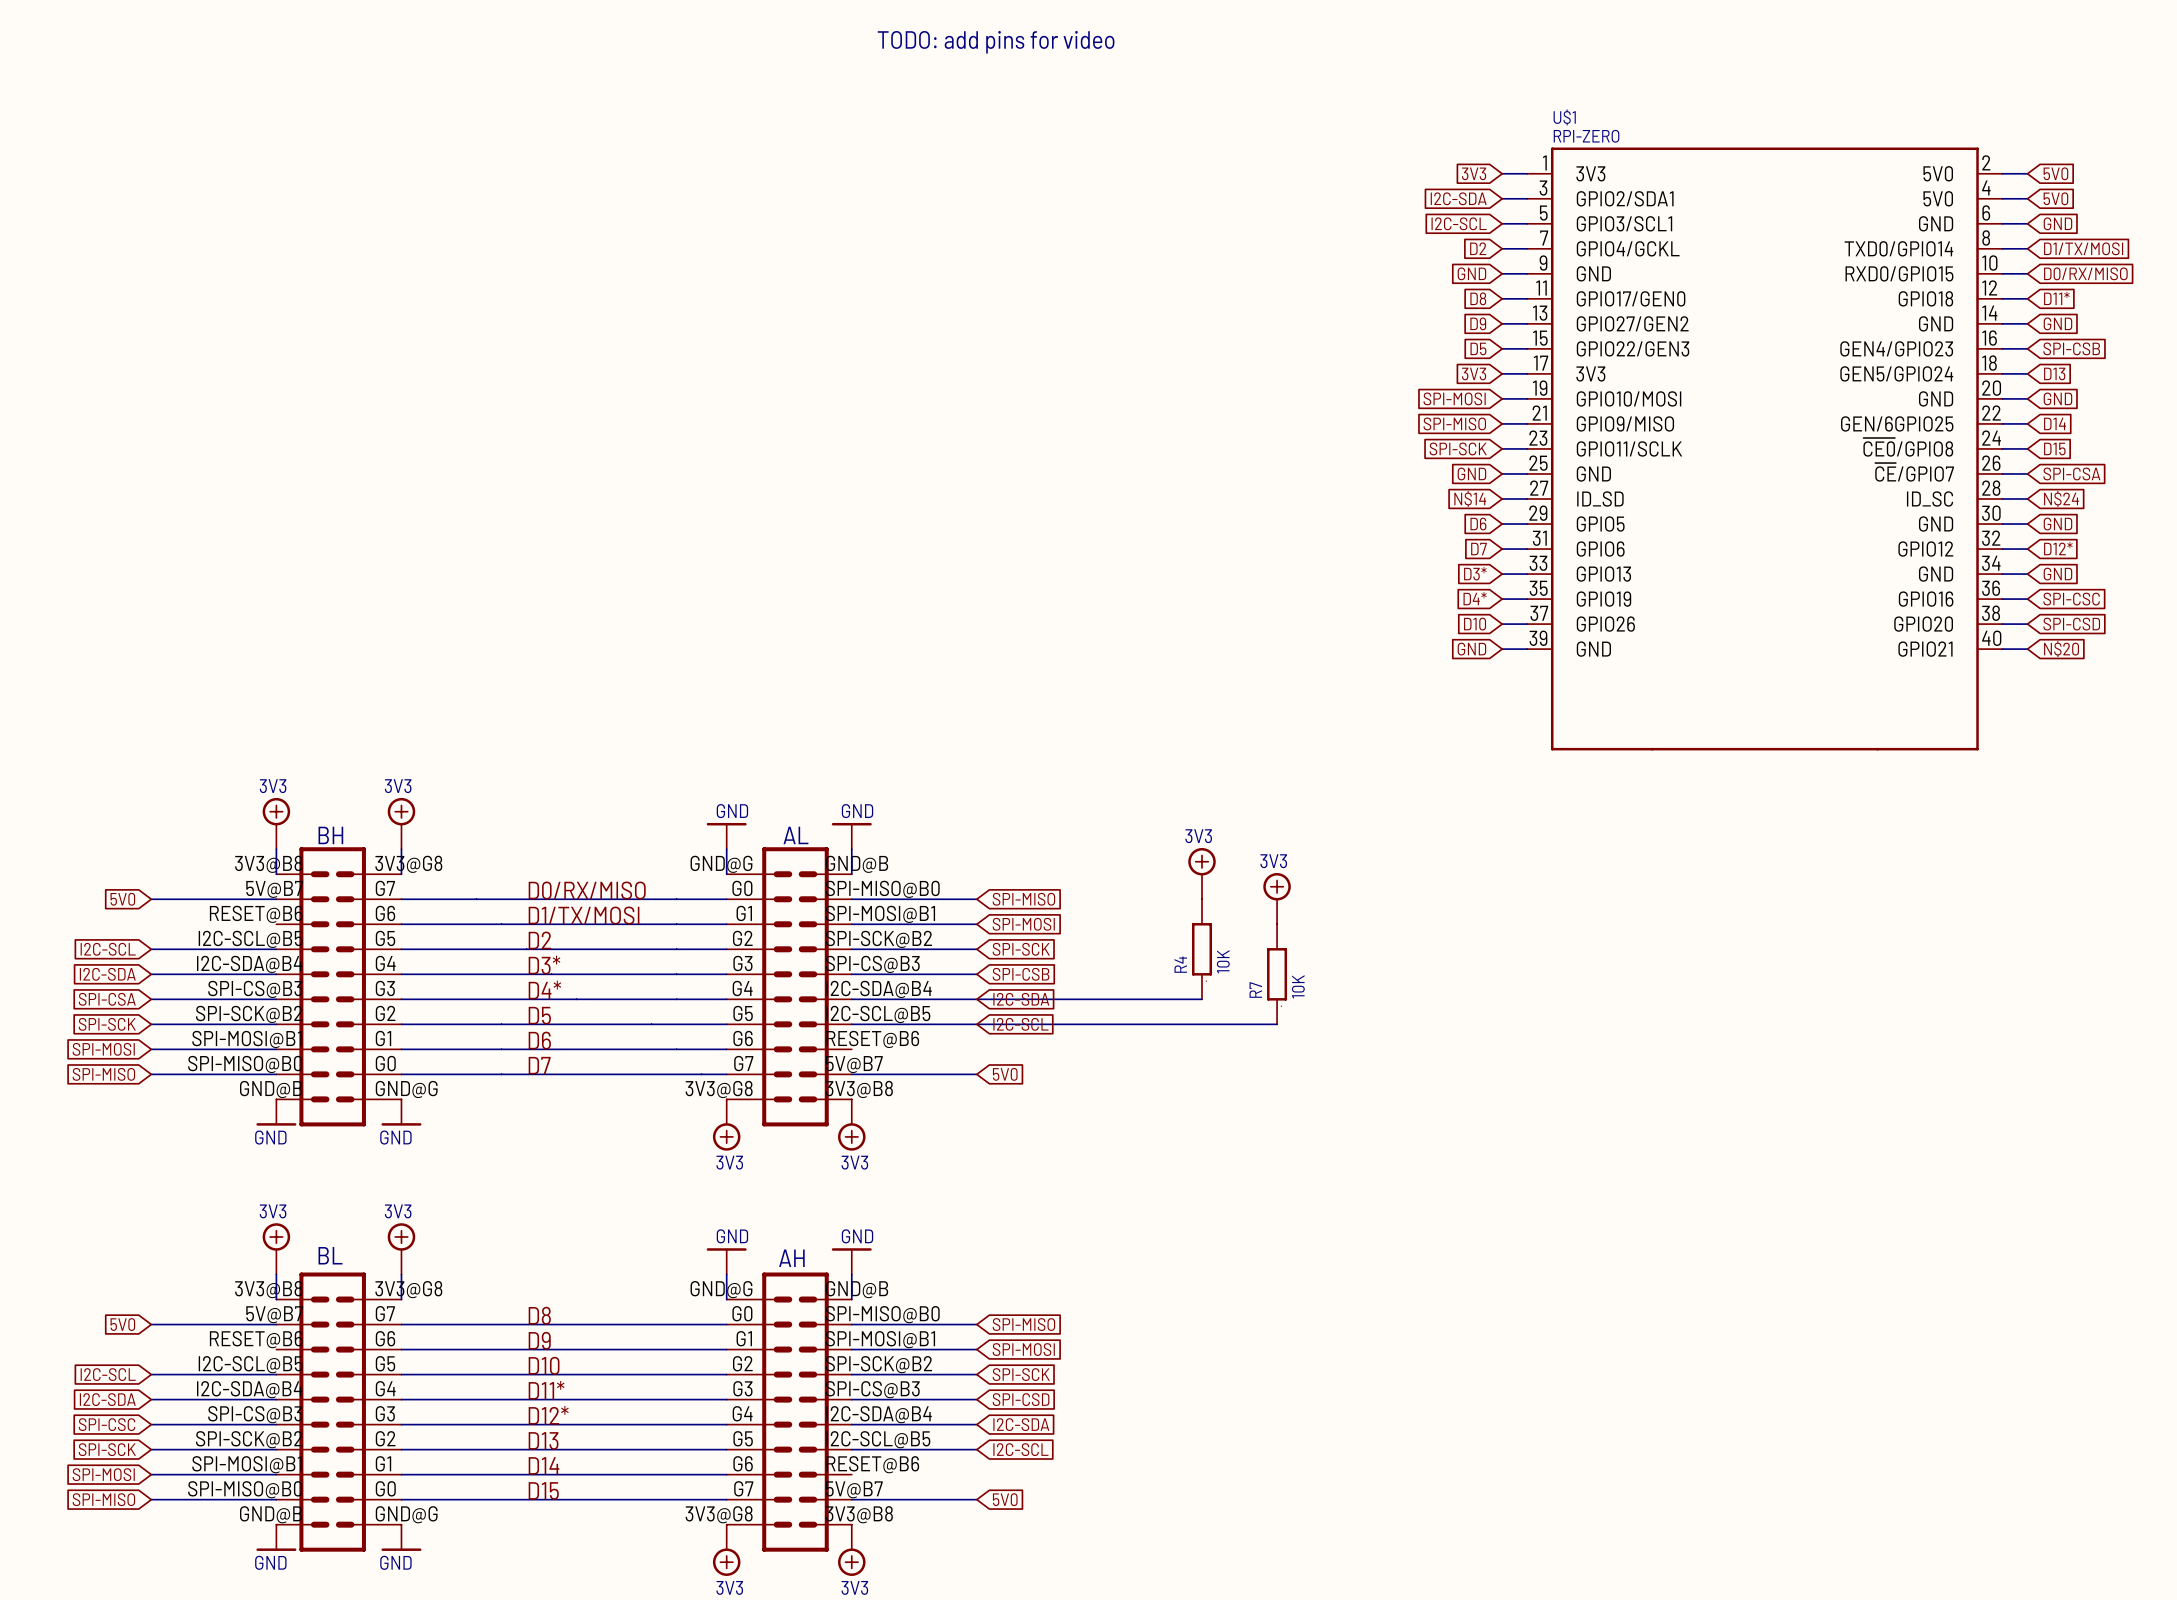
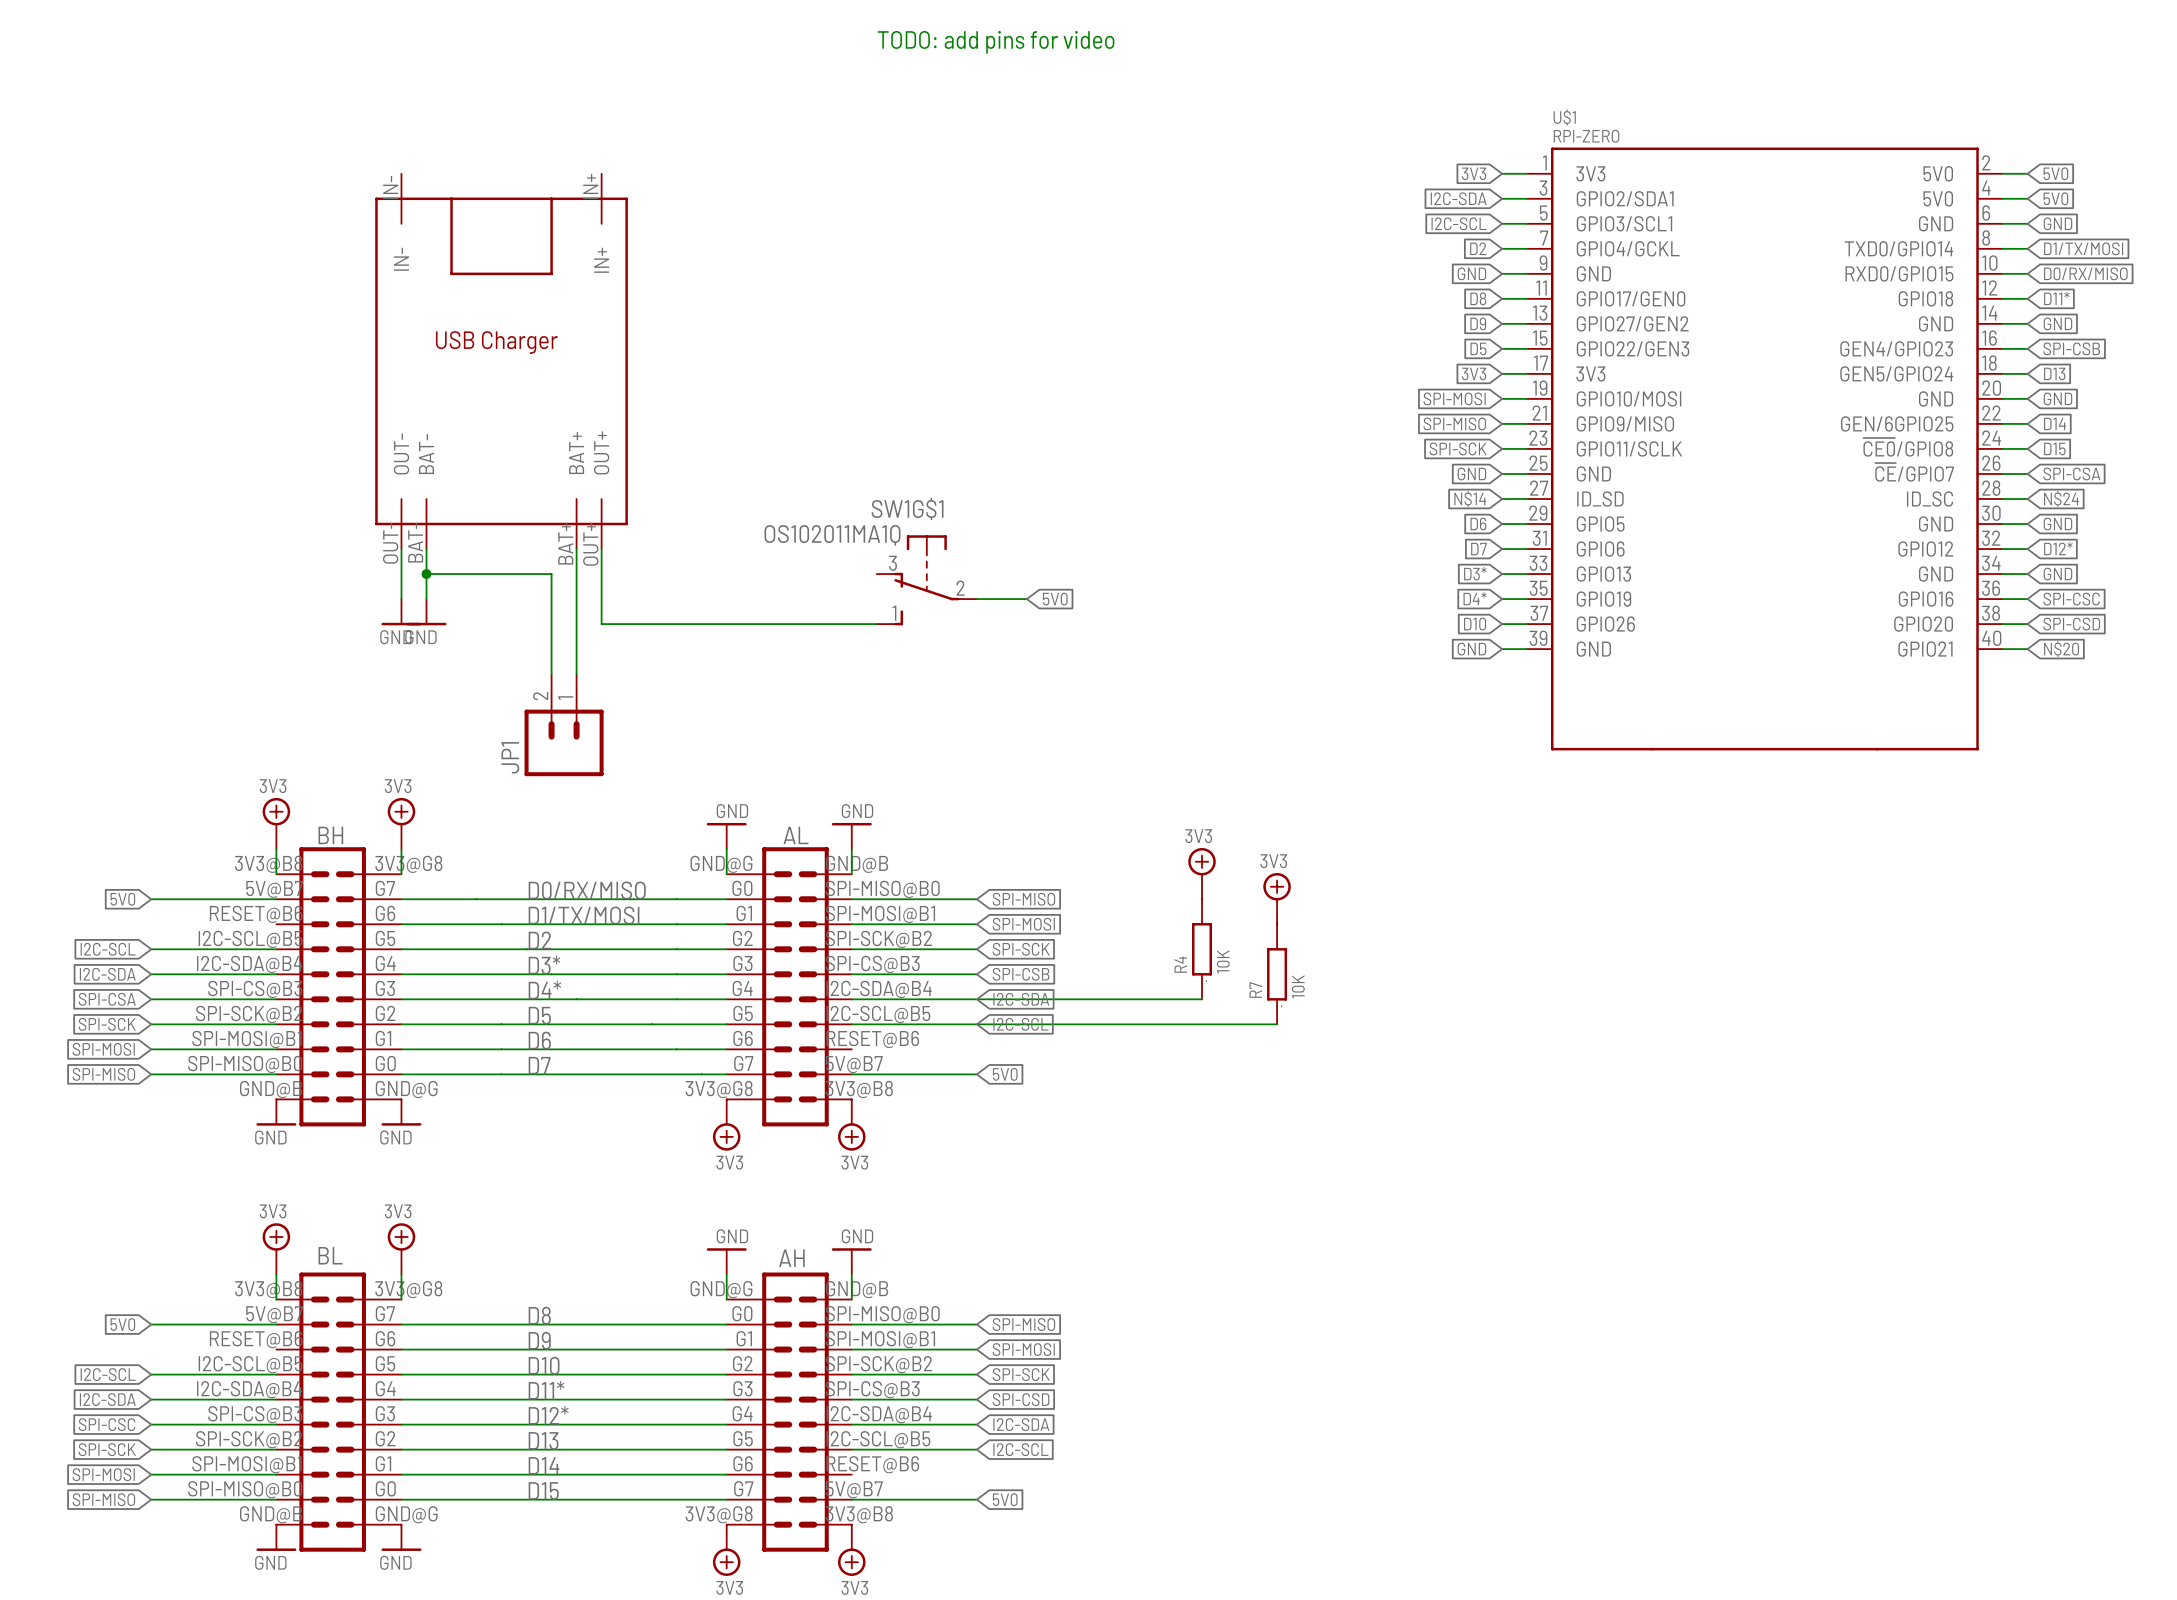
part: none -> (501, 361)
wire: none -> (401, 549) (401, 599)
wire: none -> (426, 549) (426, 599)
wire: none -> (576, 549) (576, 674)
wire: none -> (601, 549) (601, 624) (876, 624)
wire: none -> (426, 574) (551, 574) (551, 674)
junction: none -> (426, 574)
SW1G$1: none -> OS102011MA1Q (926, 580)
wire: none -> (976, 599) (1026, 599)
global label: none -> 5V0 (1055, 599)
power symbol: none -> GND (401, 612)
power symbol: none -> GND (426, 612)
JP1: none -> (564, 725)

